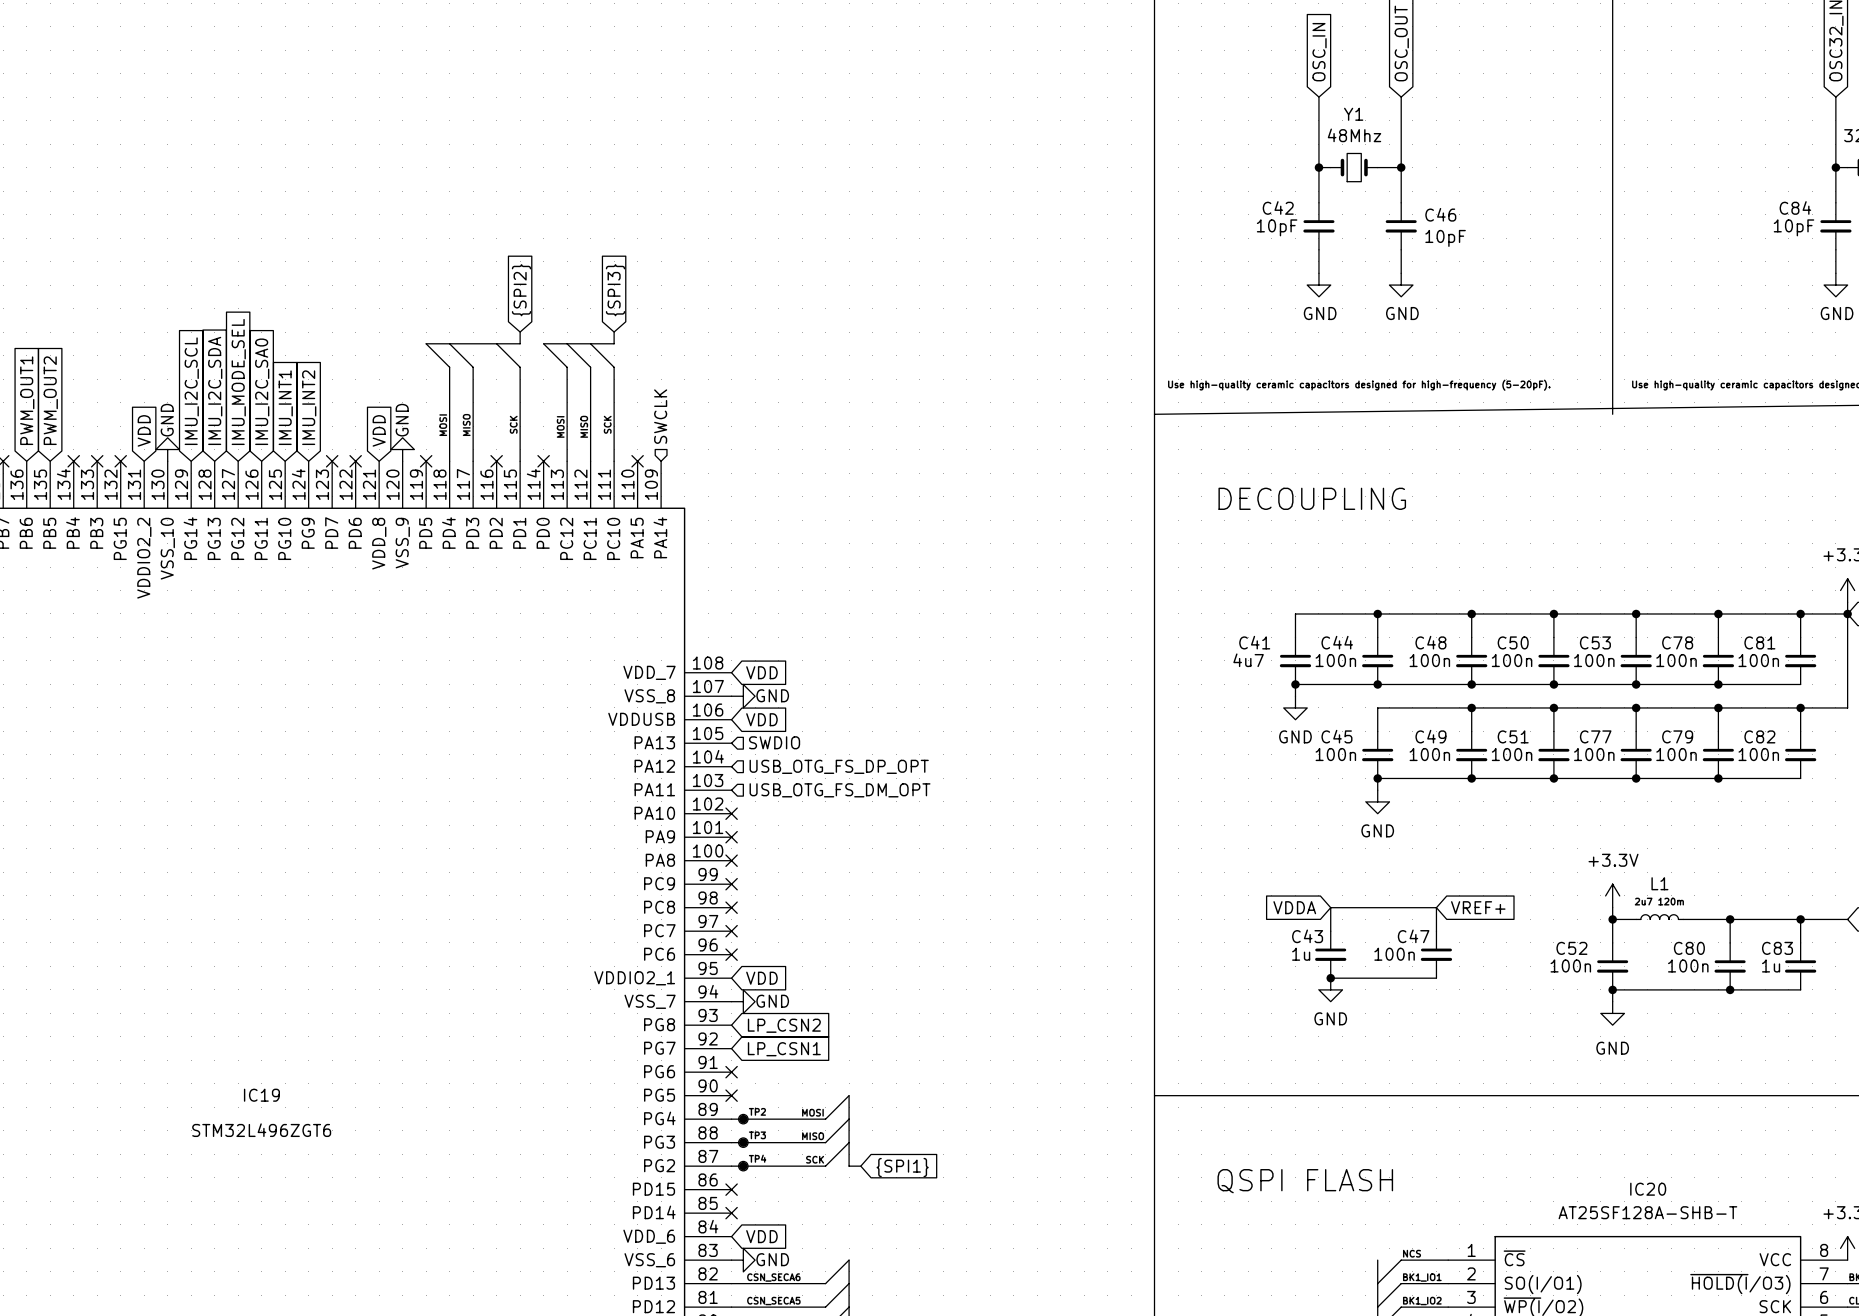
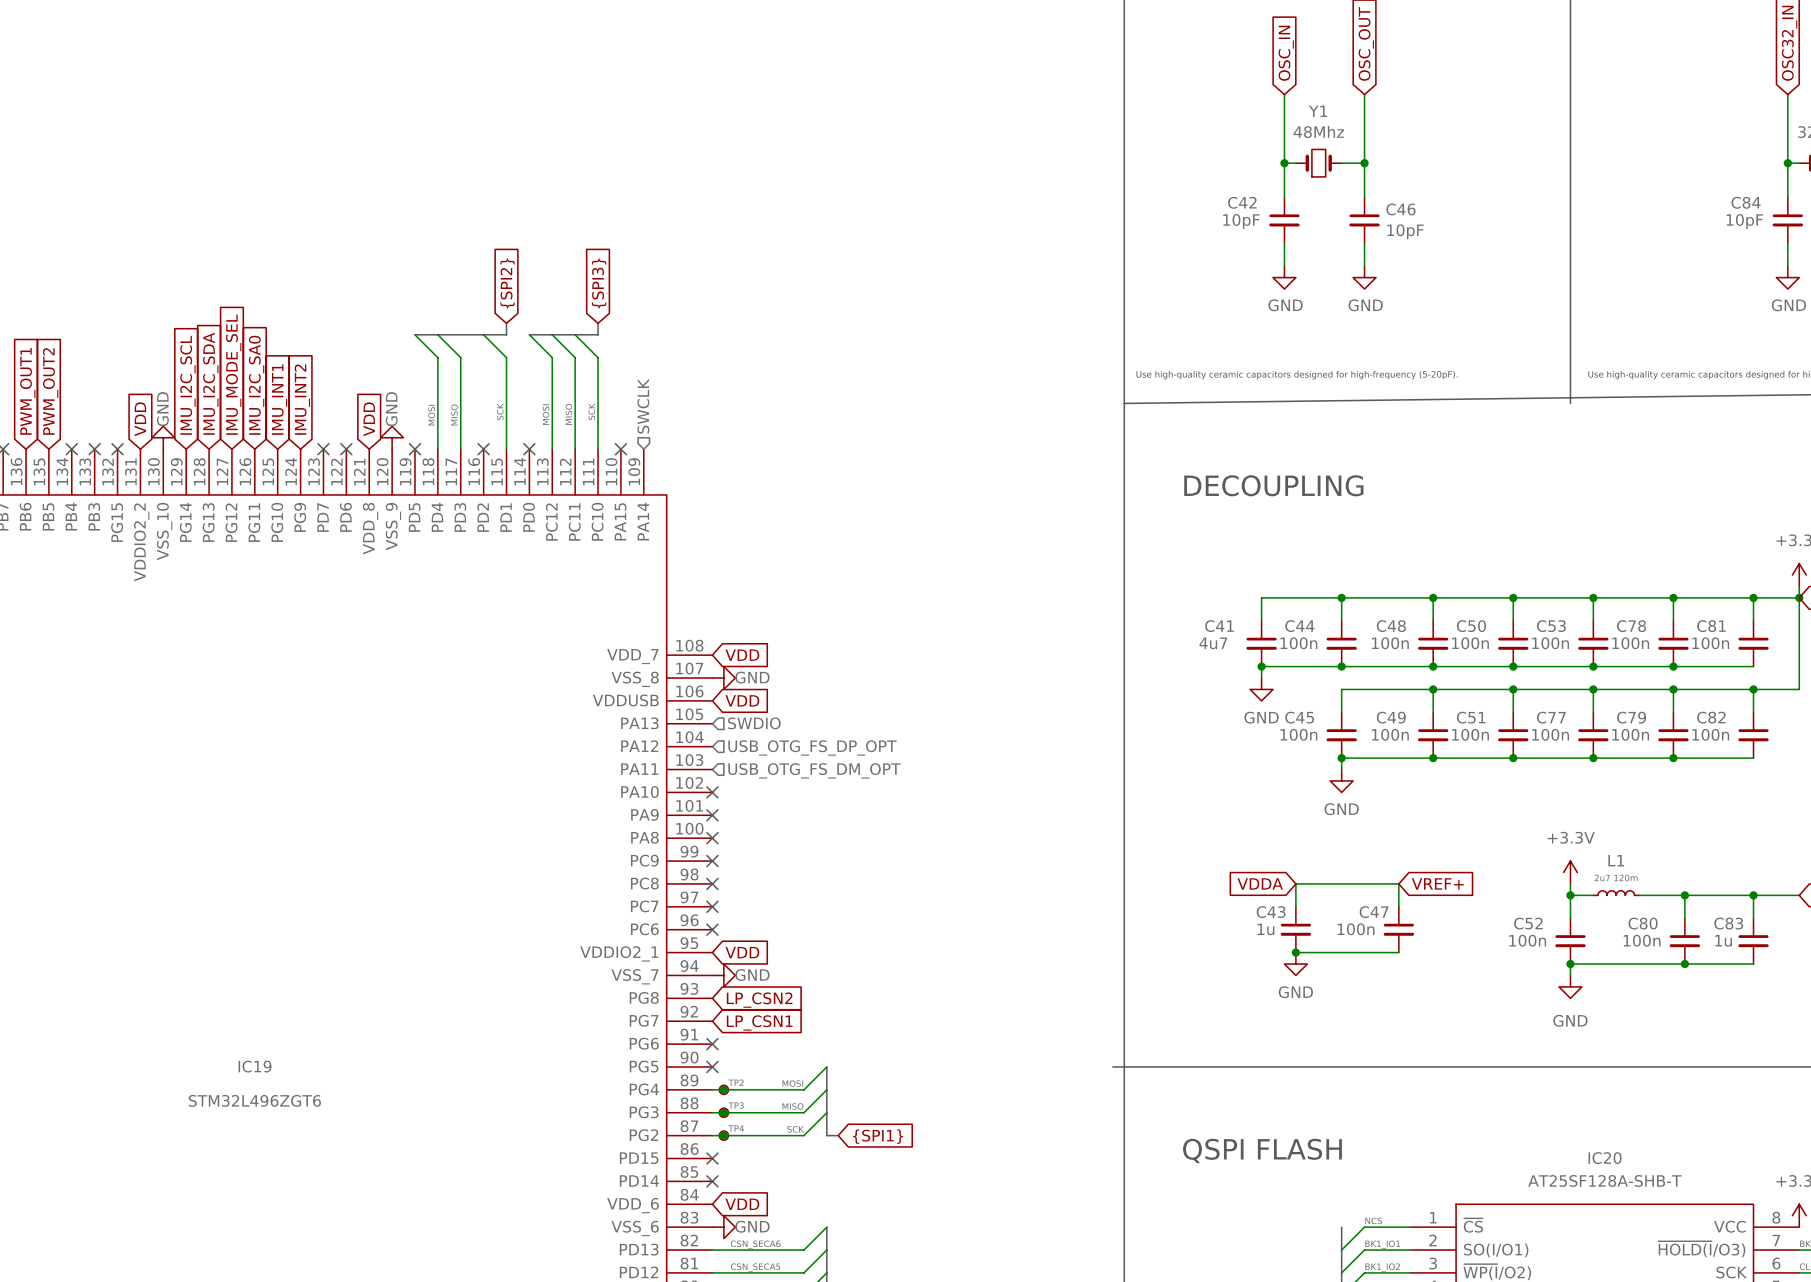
line: none -> (1112, 1066) (1124, 1066)

